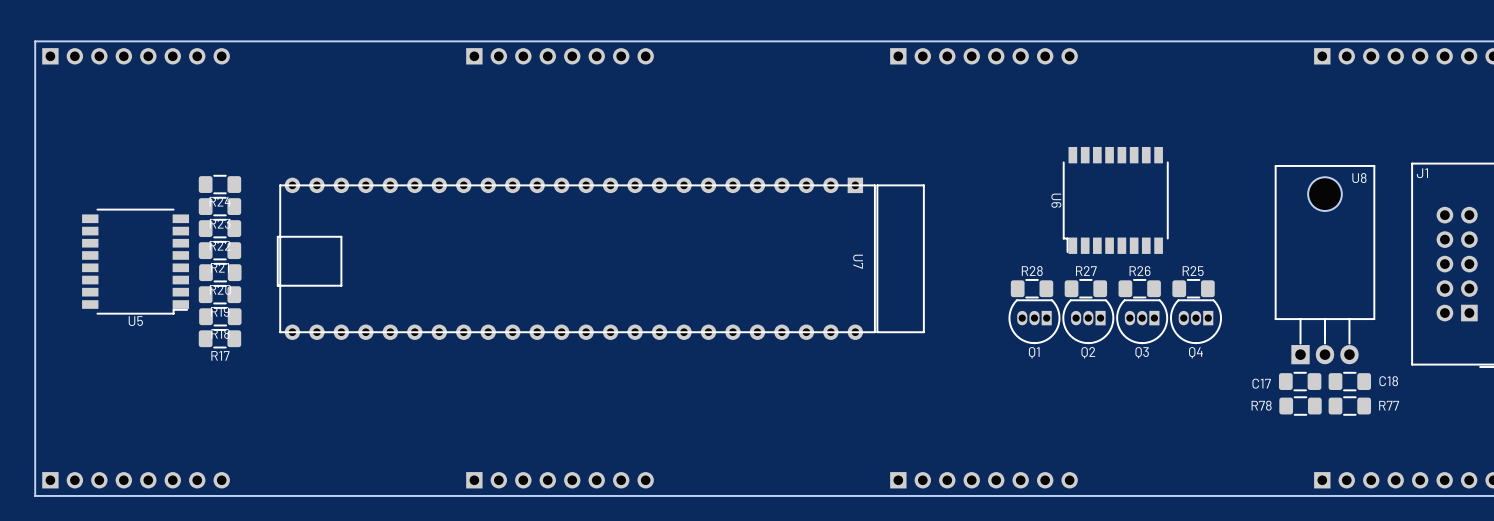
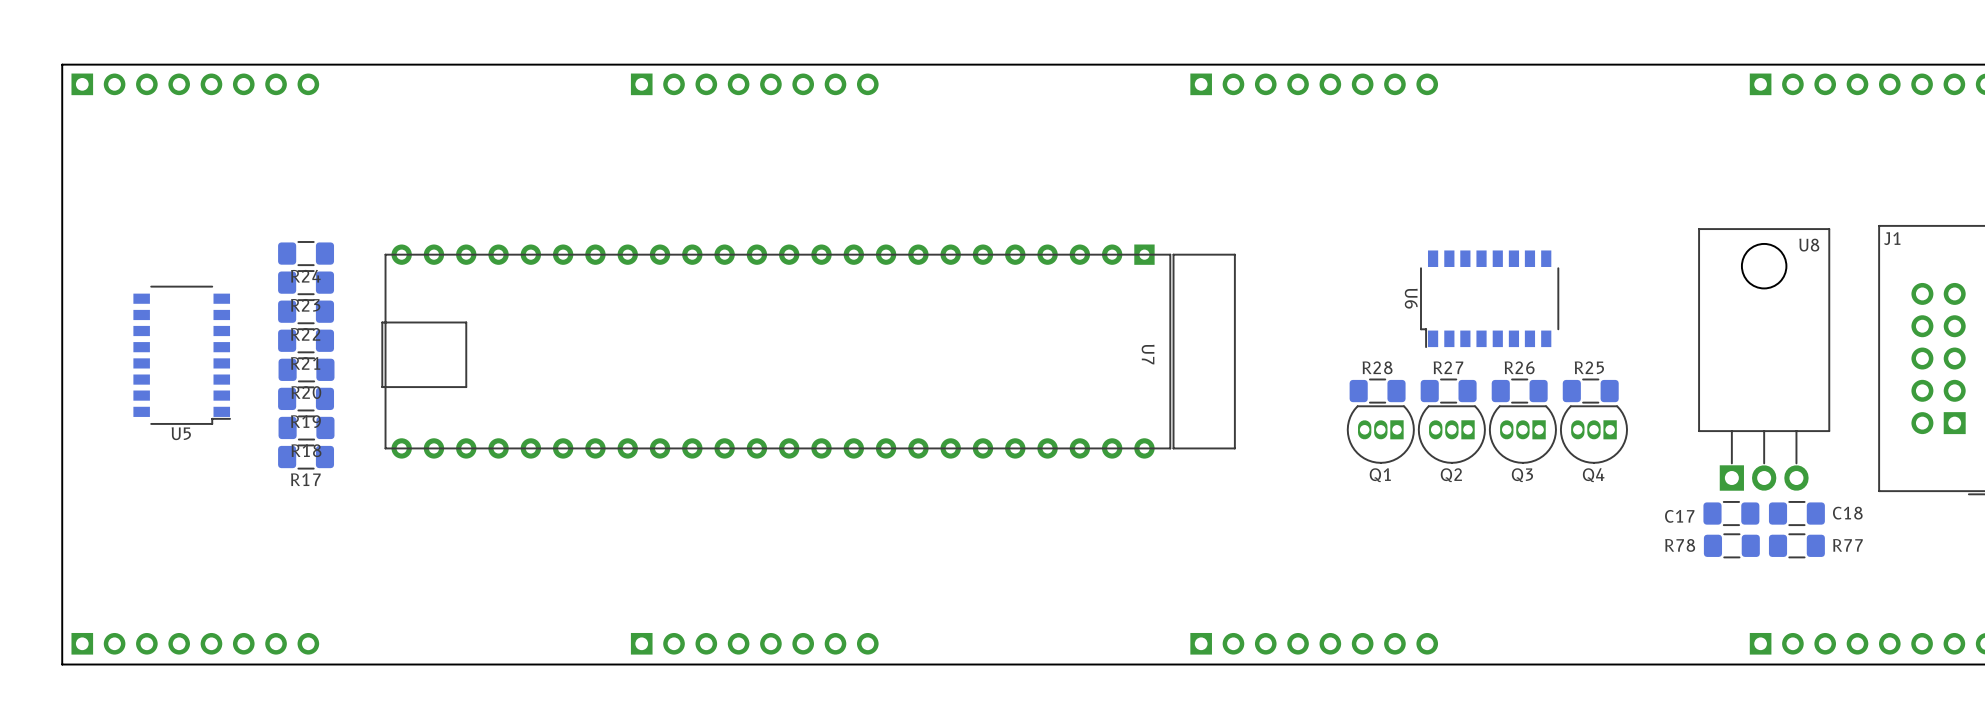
U6 footprint: [1063, 146, 1169, 254] -> [1420, 250, 1560, 348]
U5 footprint: [82, 209, 190, 315] -> [133, 285, 231, 425]

